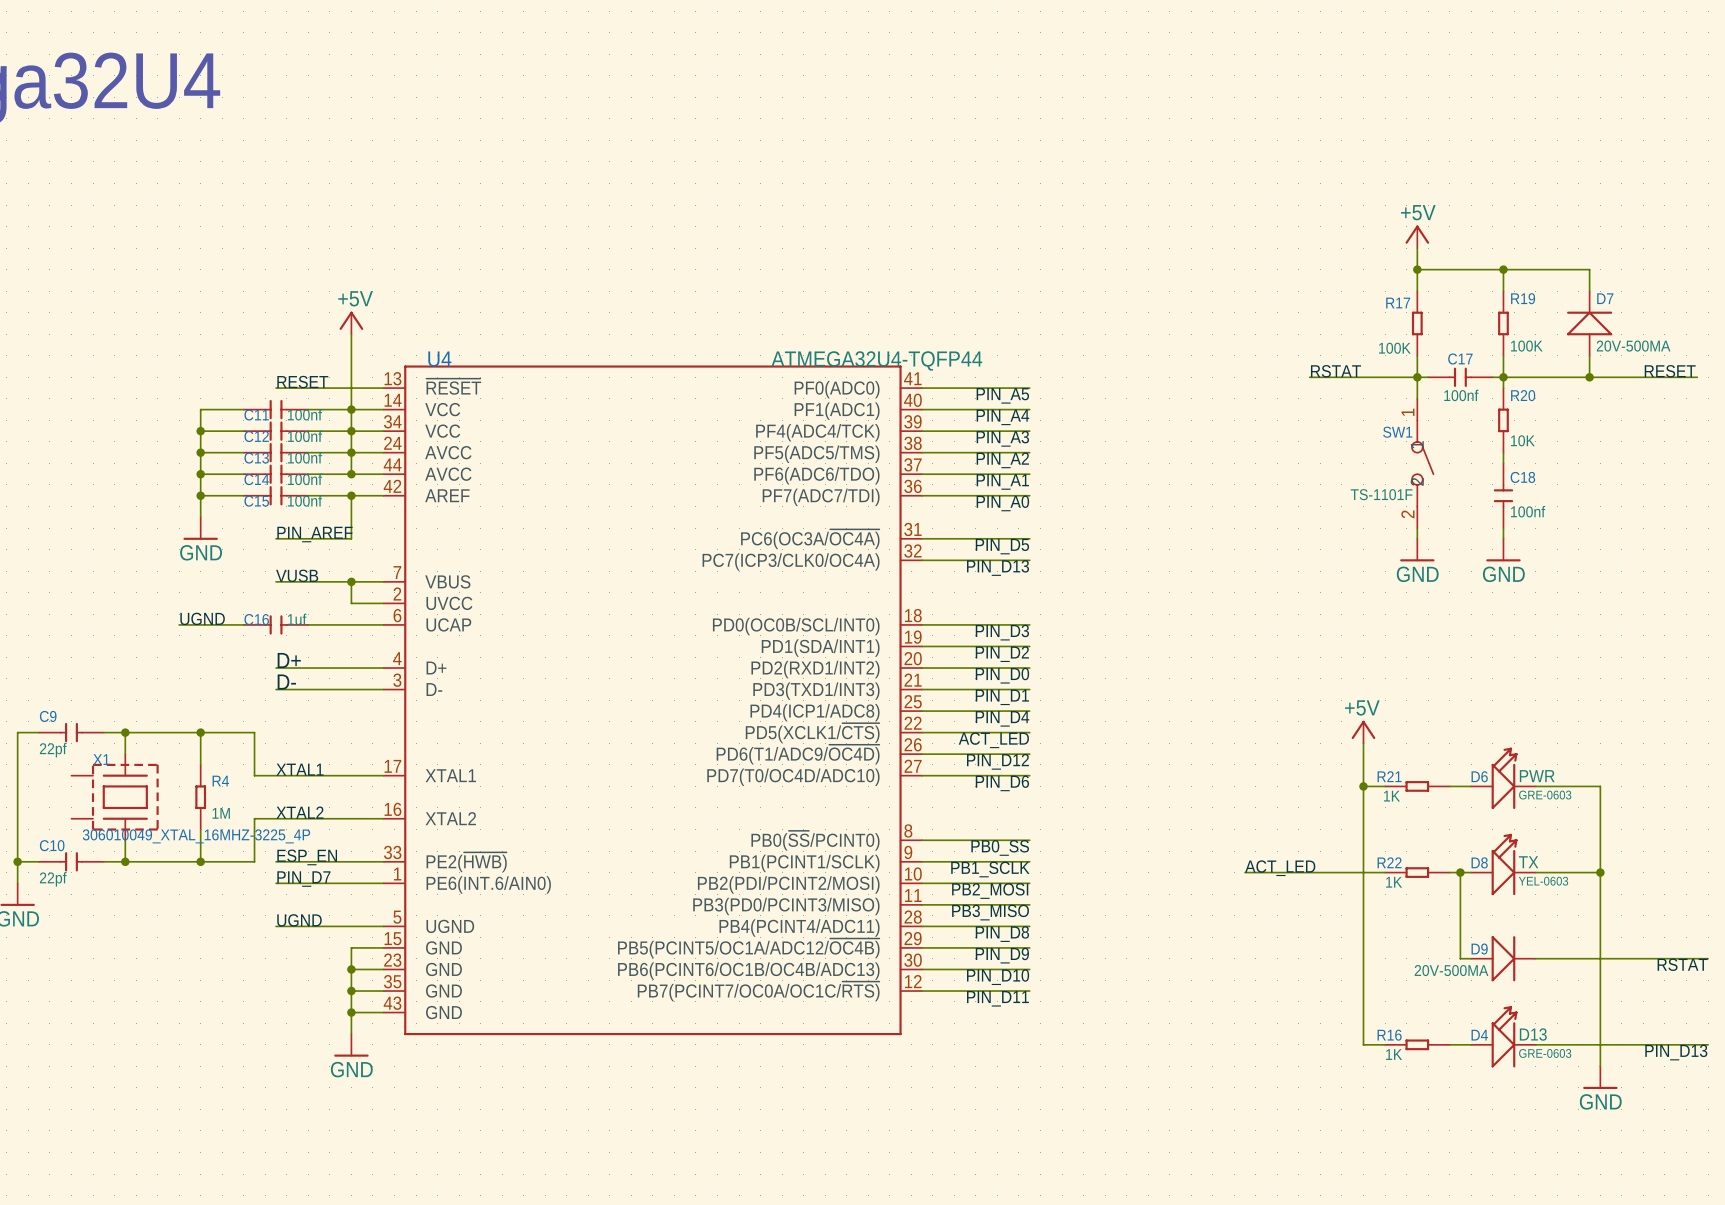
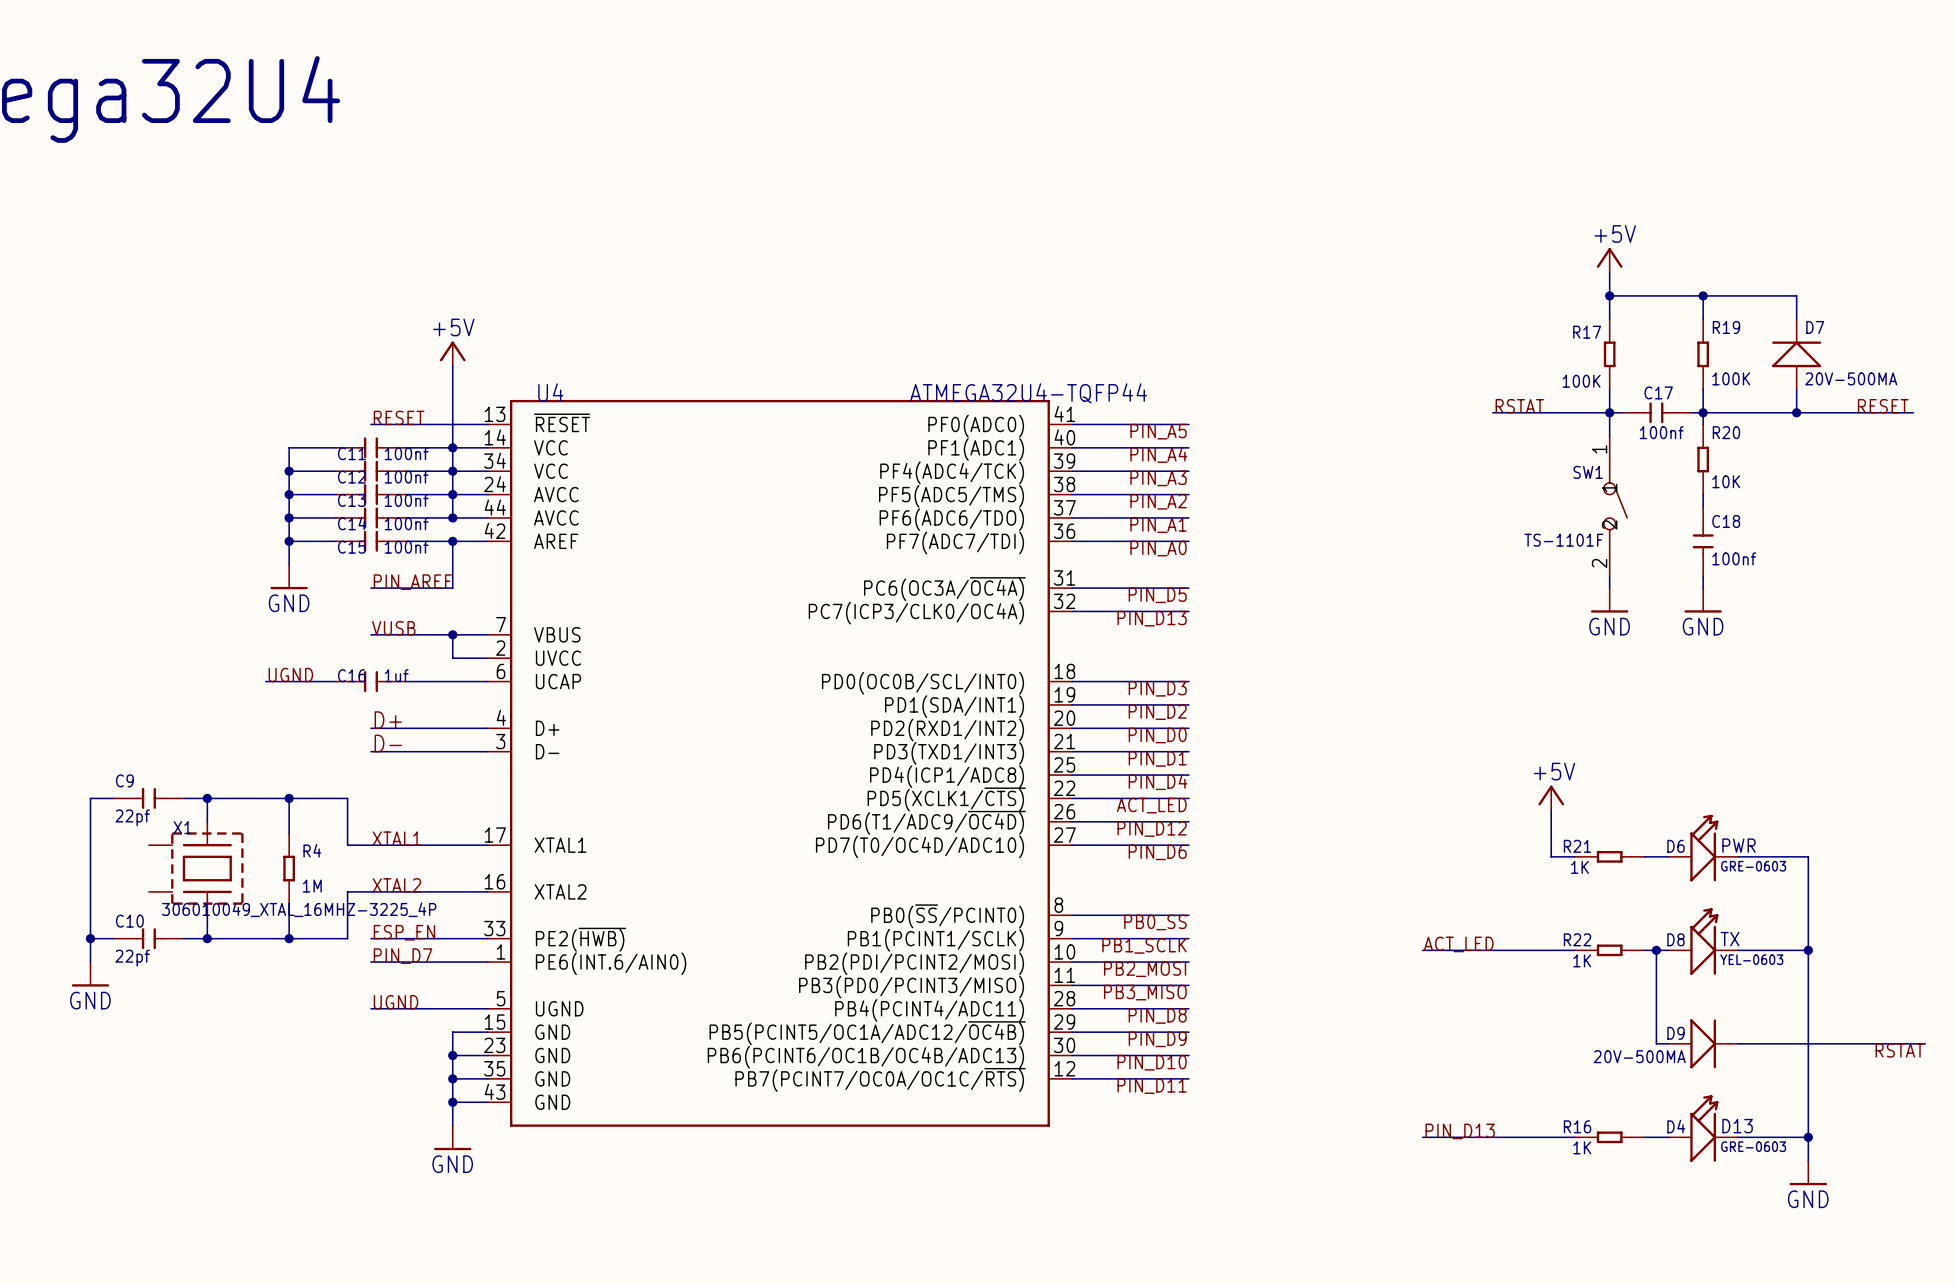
wire: (1363, 786) (1363, 1044) -> (1422, 1137) (1551, 1137)
junction: (1363, 786) -> none
label: none -> PIN_D13 (1460, 1131)
wire: (1600, 1044) (1708, 1044) -> none
junction: none -> (1808, 1137)
label: PIN_D13 (1676, 1052) -> none

